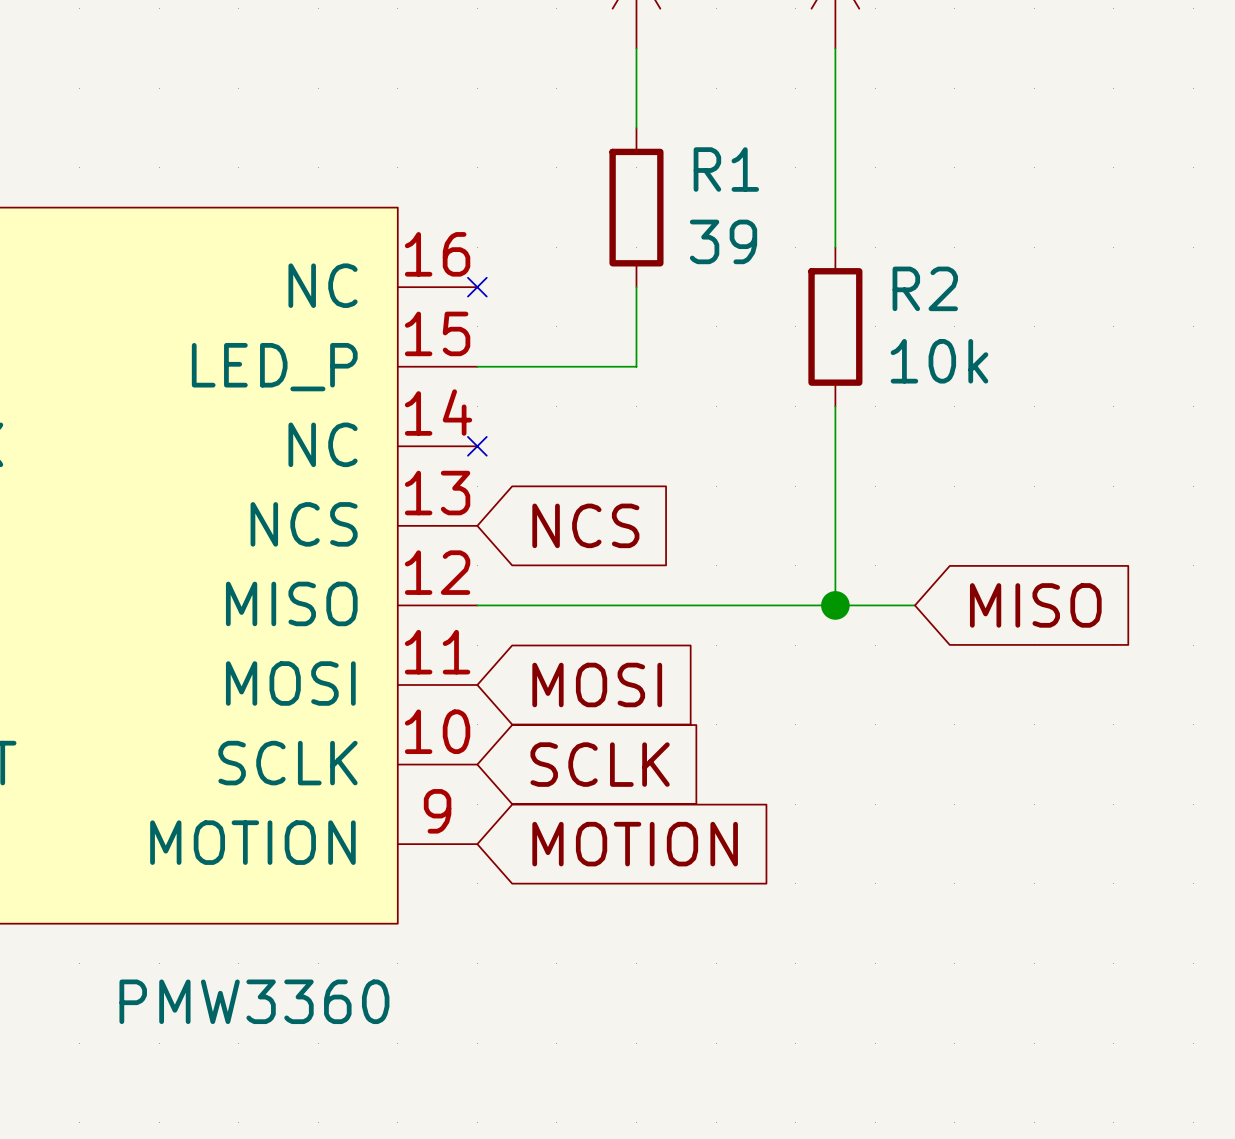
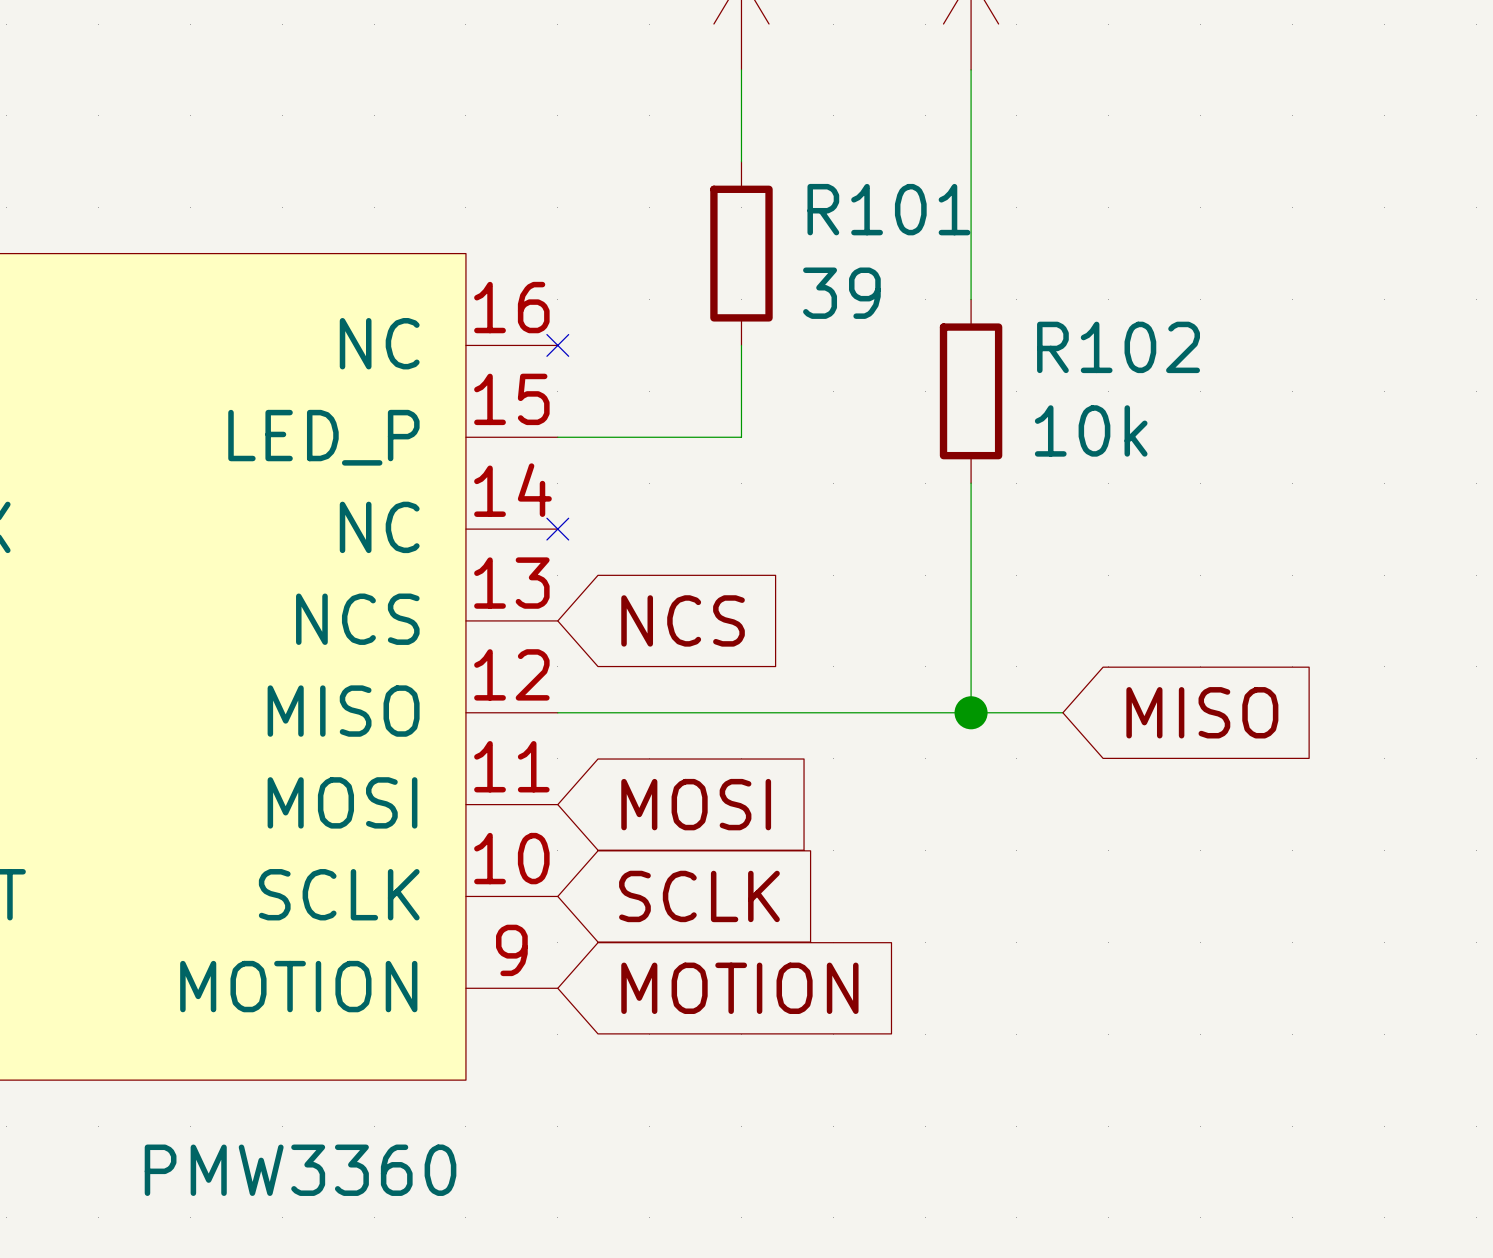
R1 name: R1 (726, 169) -> R101 (888, 209)
R2 name: R2 (925, 288) -> R102 (1118, 347)

